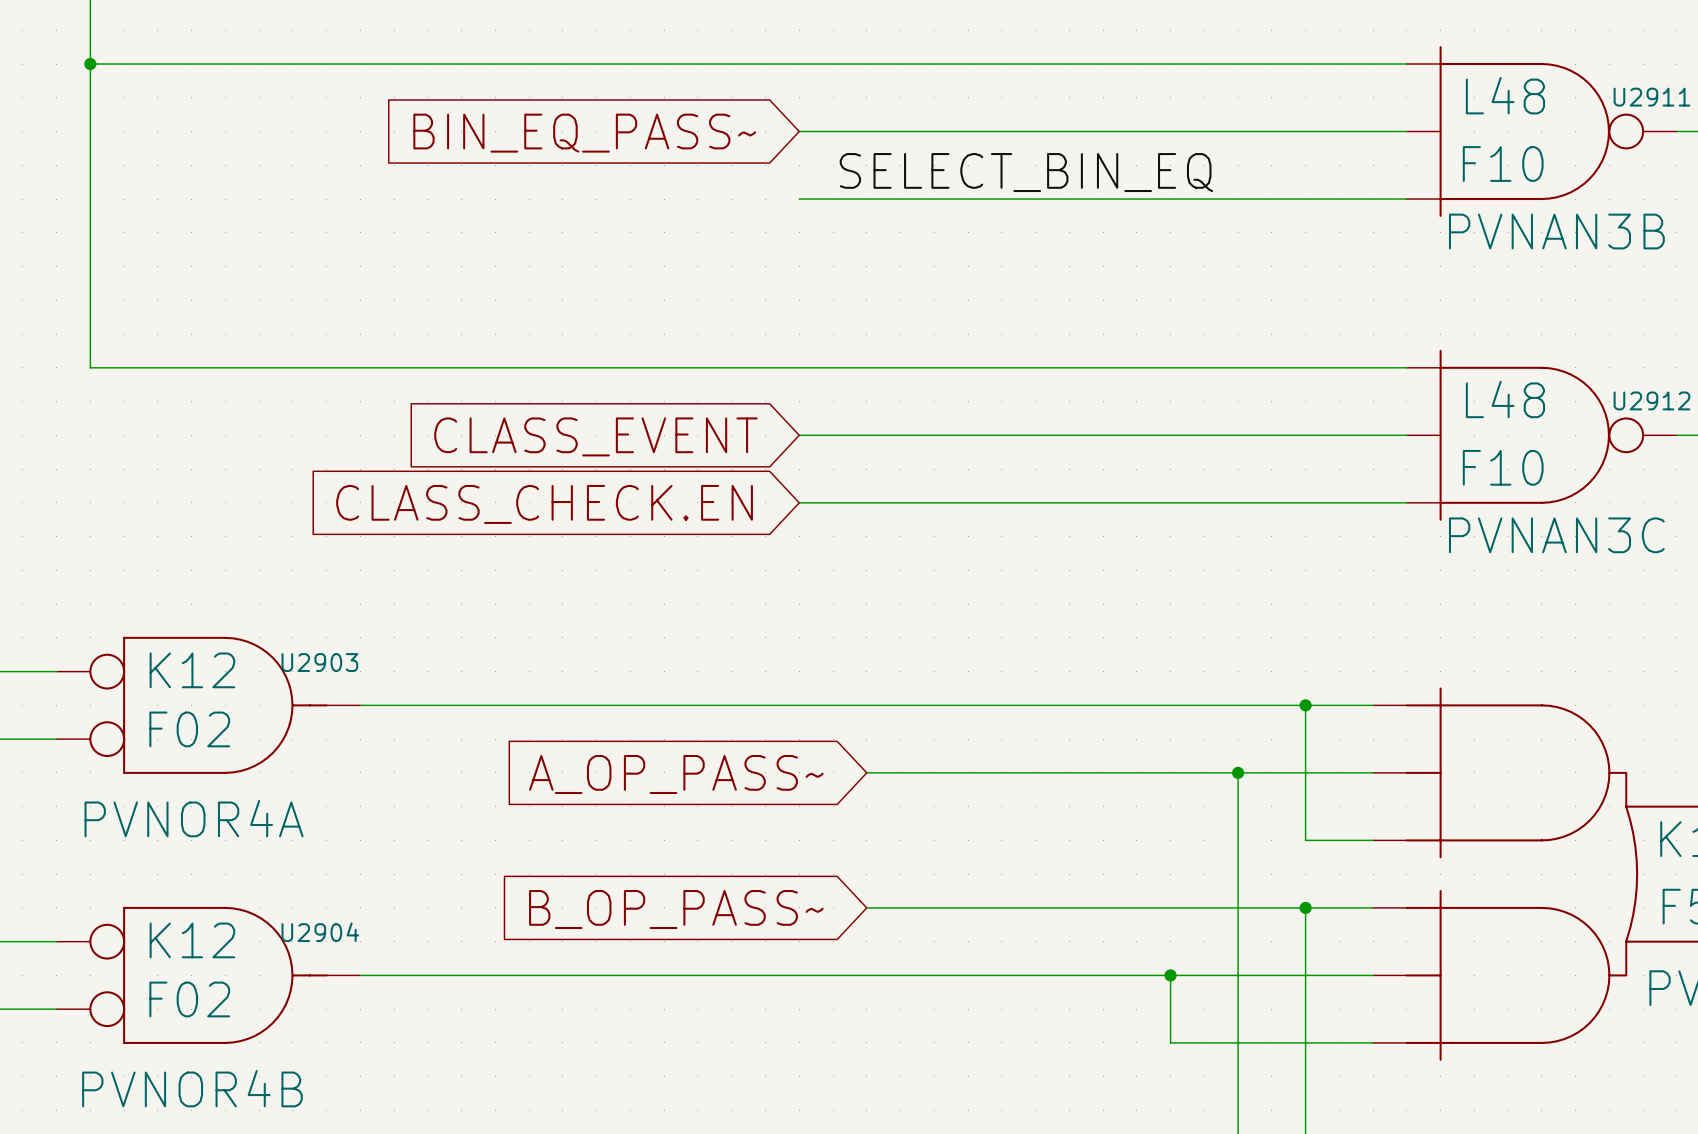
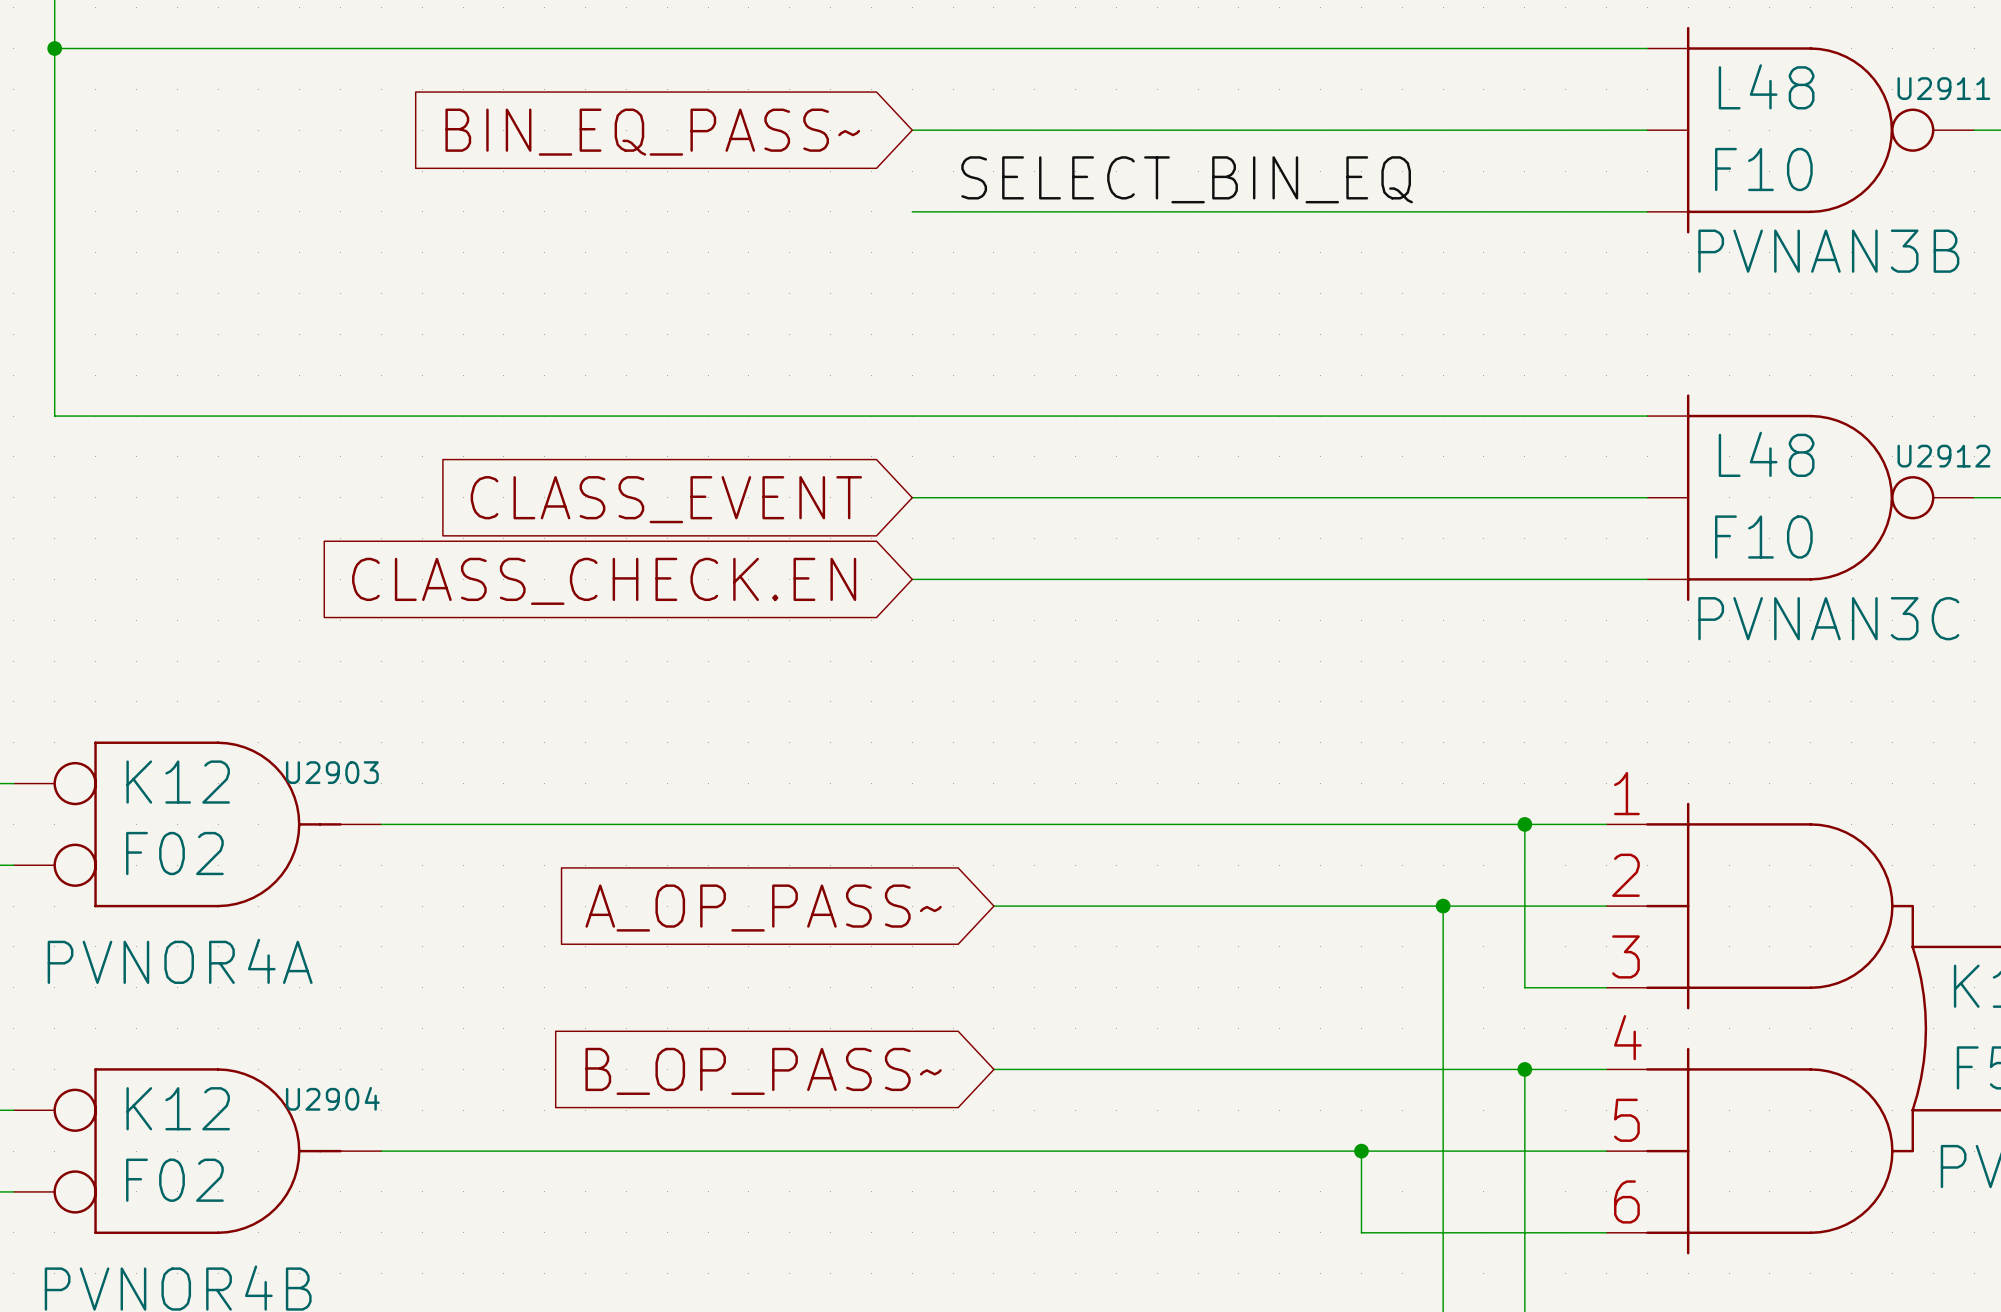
part pin number: none -> 1 (1626, 793)
part pin number: none -> 2 (1625, 875)
part pin number: none -> 3 (1625, 956)
part pin number: none -> 4 (1627, 1037)
part pin number: none -> 5 (1626, 1120)
part pin number: none -> 6 (1626, 1201)

